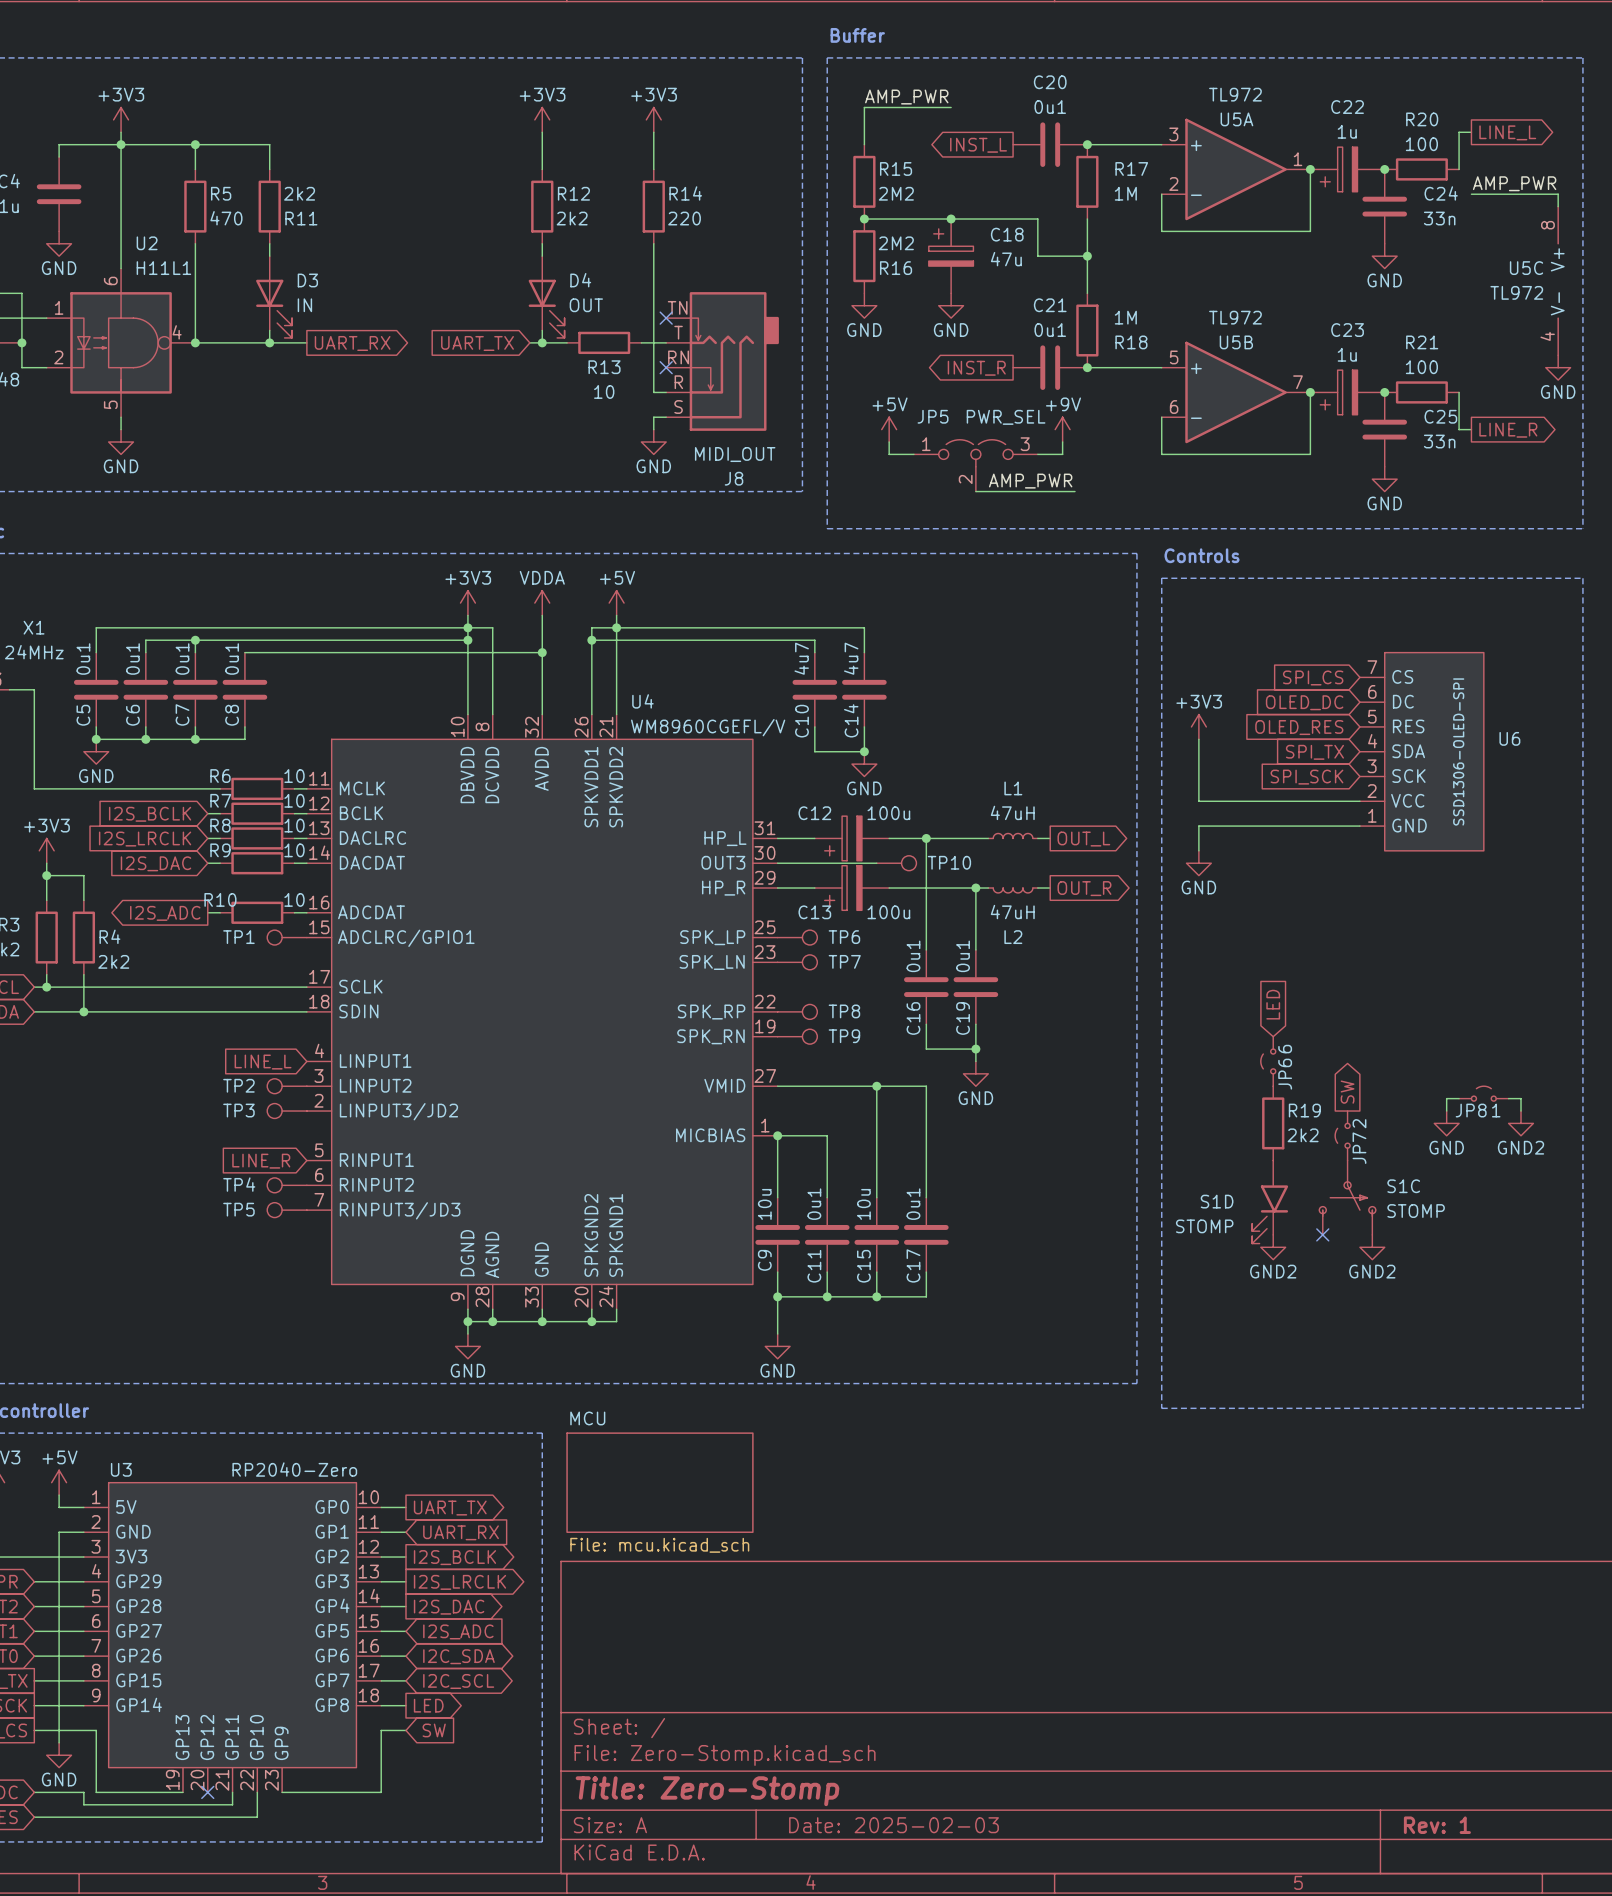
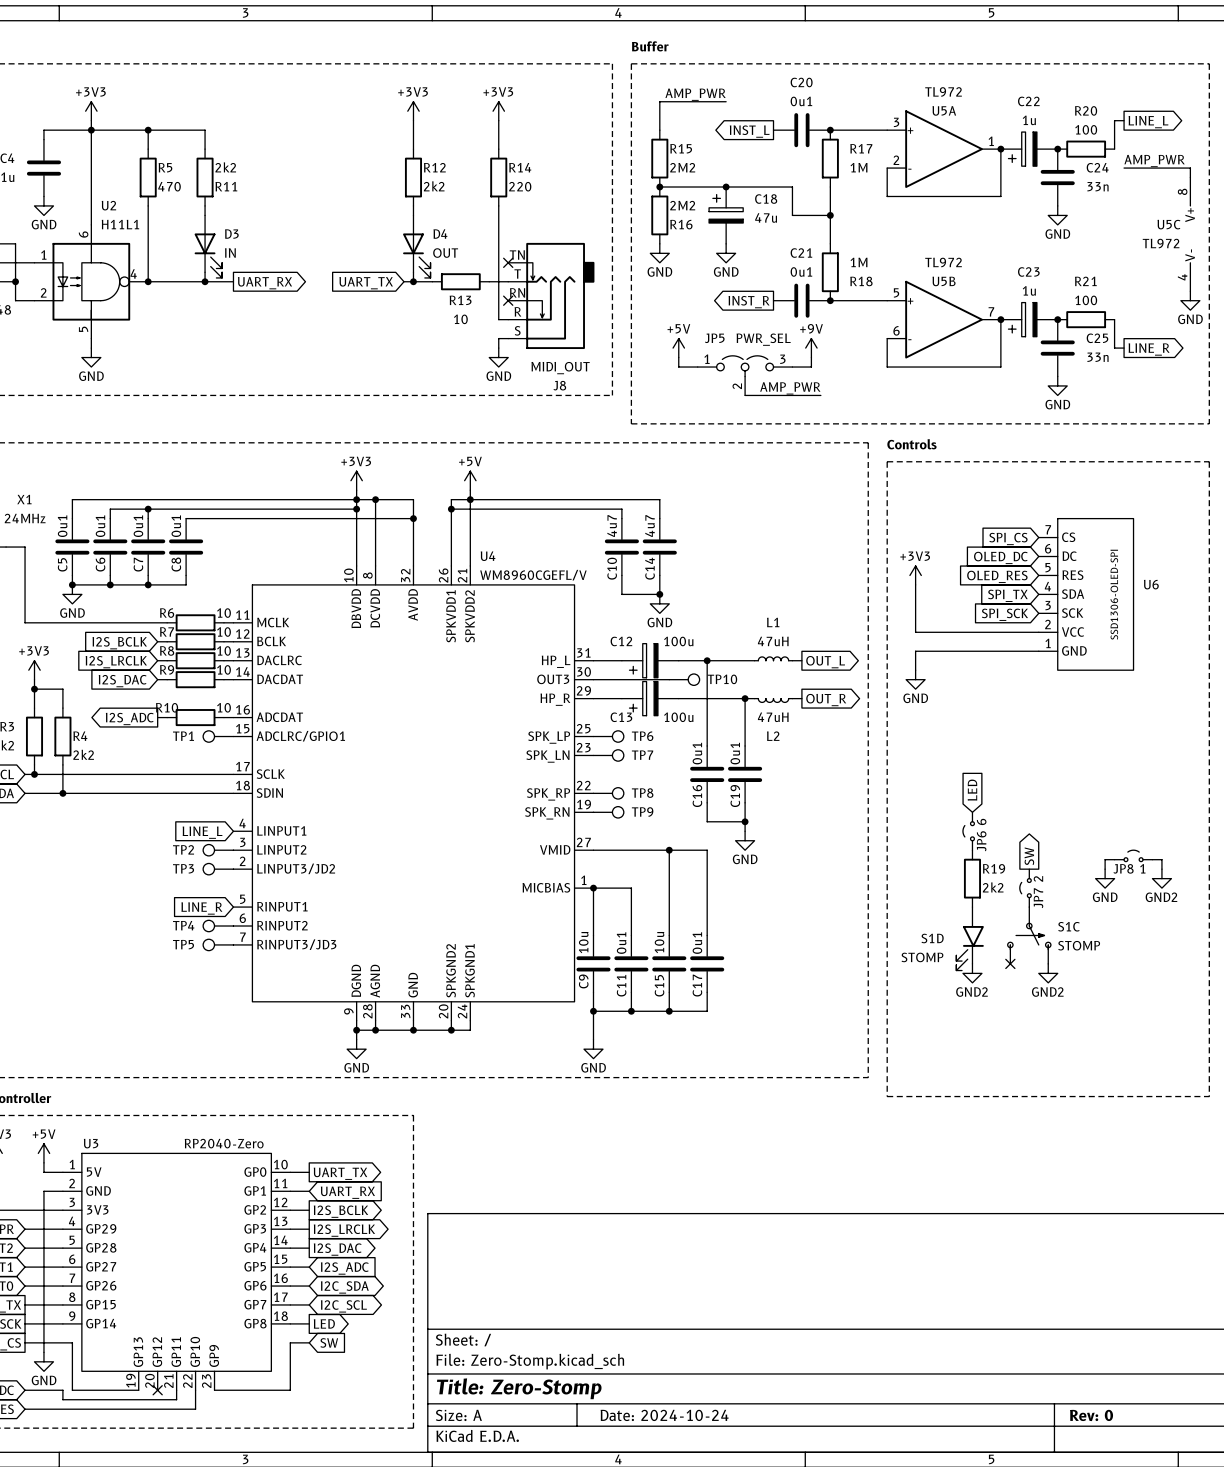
power symbol: VDDA (542, 603) -> none
wire: (542, 615) (542, 627) -> (375, 499) (413, 499)
junction: none -> (375, 499)
sheet MCU: File: mcu.kicad_sch (659, 1482) -> none
title block: Date: 2025-02-03 (894, 1825) -> Date: 2024-10-24 (664, 1415)
title block: Rev: 1 (1437, 1825) -> Rev: 0 (1091, 1415)

